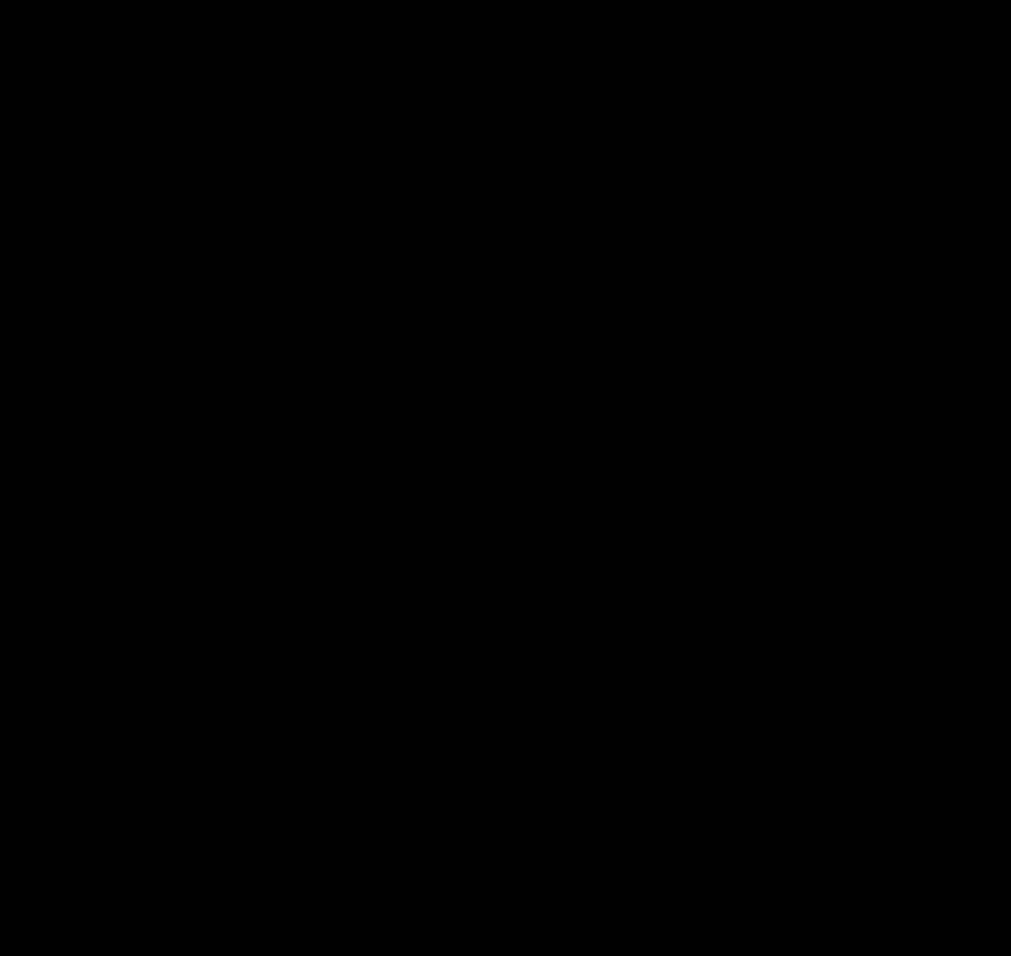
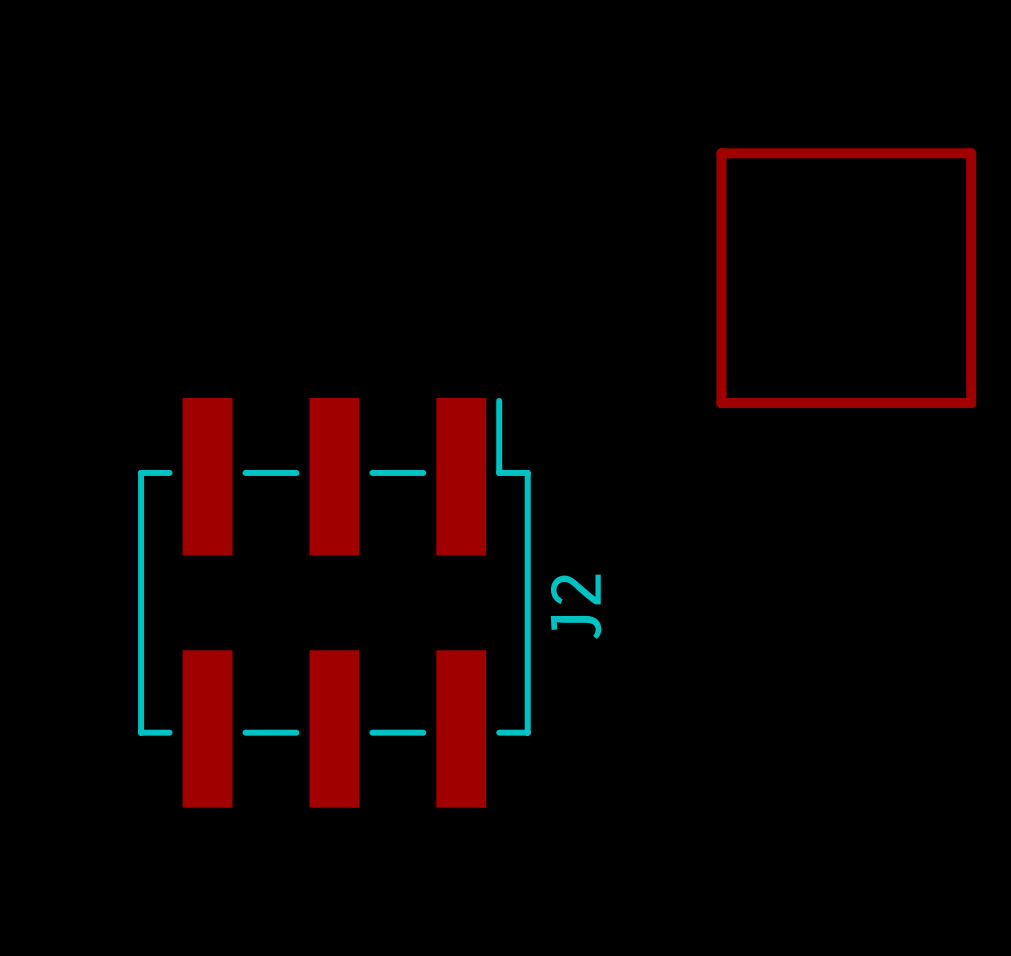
top track: none -> (721, 153) (971, 153) (971, 403) (721, 403) (721, 153)
J2: none -> (334, 602)

